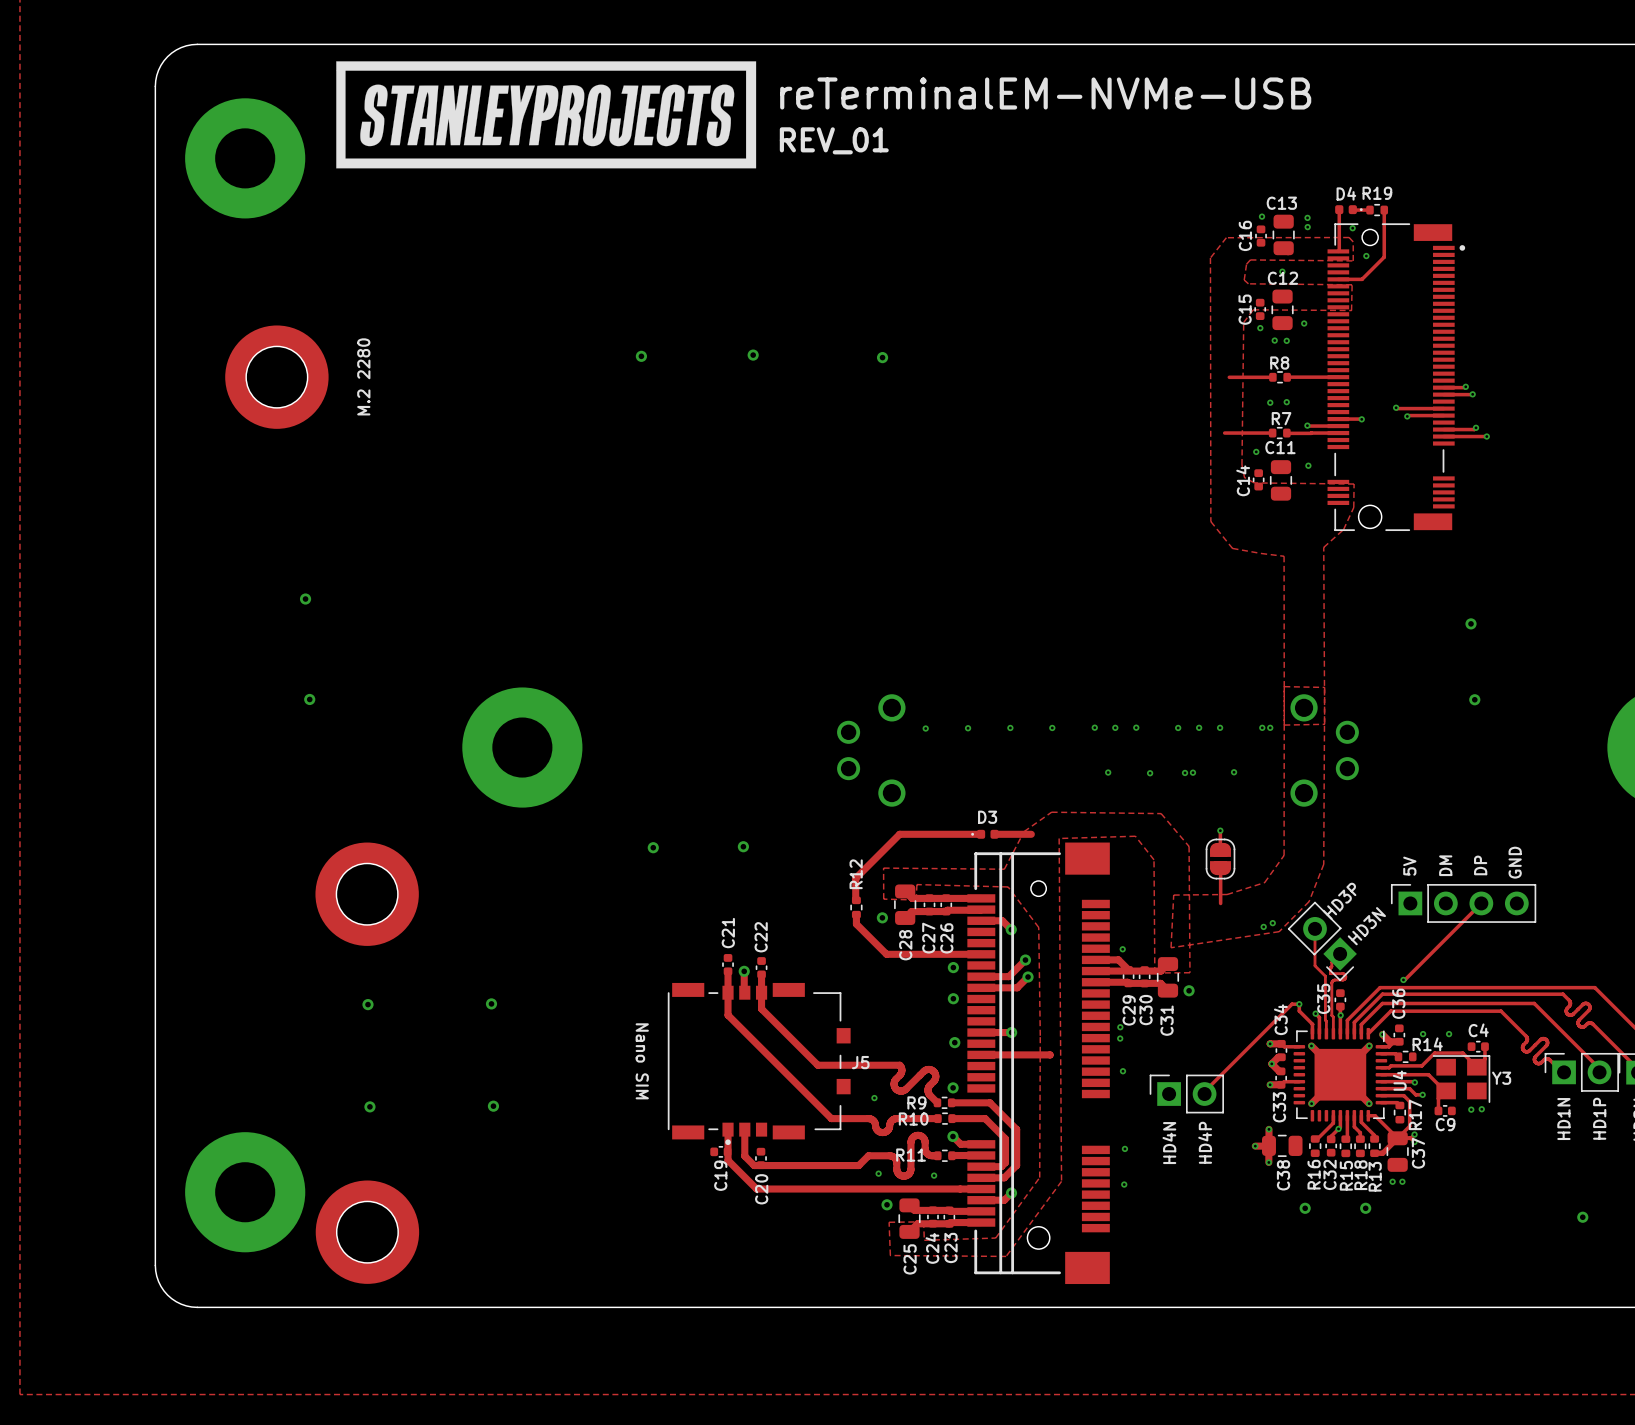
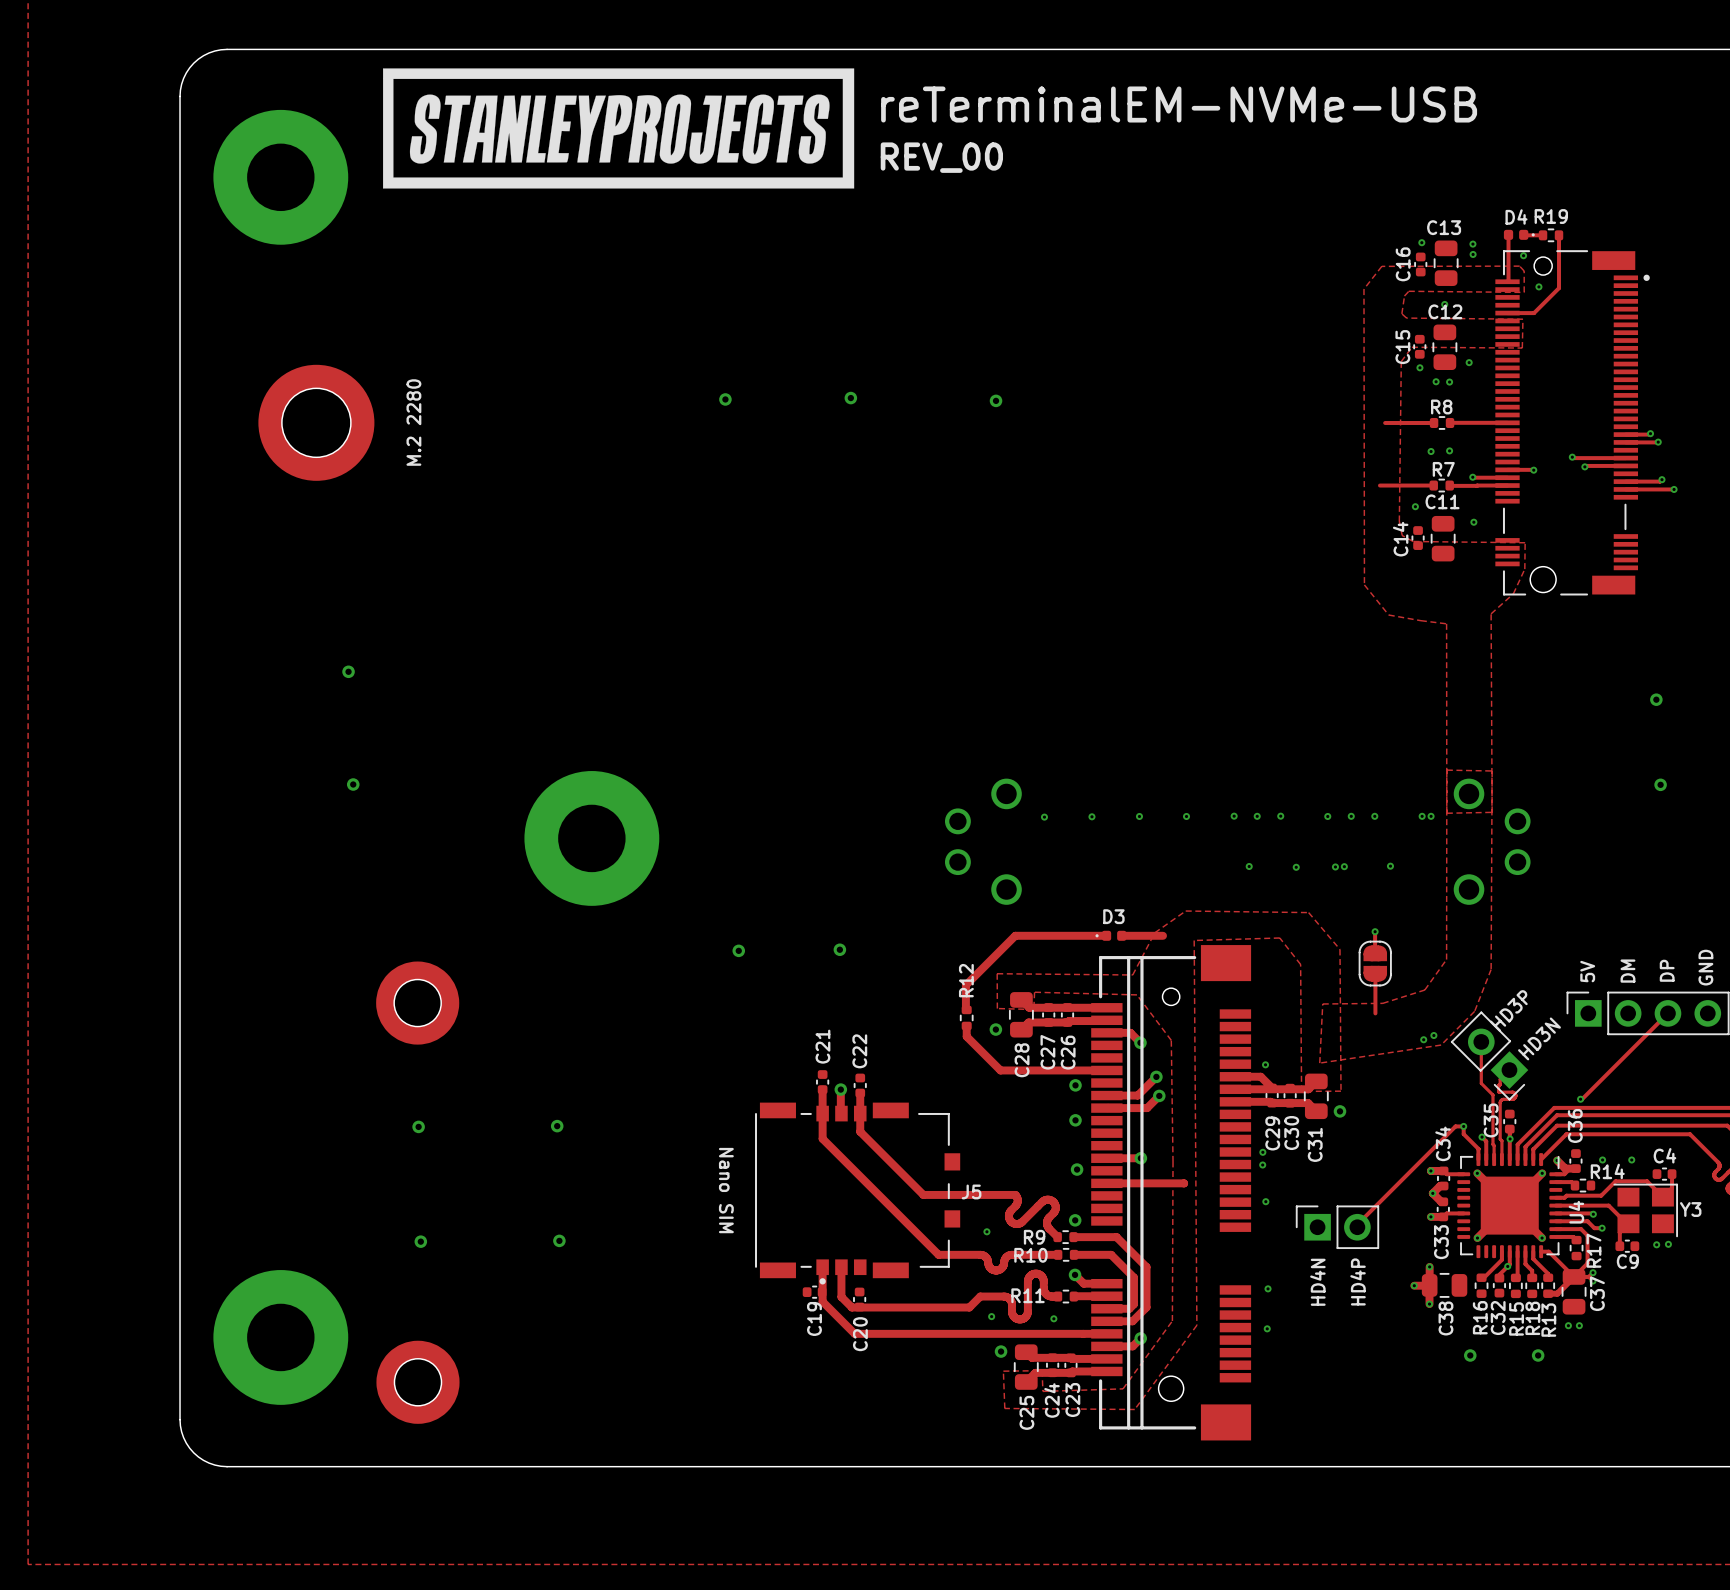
text: REV_01 (834, 140) -> REV_00 (941, 157)
part footprint: [315, 842, 419, 946] -> [376, 961, 460, 1045]
part footprint: [315, 1180, 420, 1284] -> [376, 1340, 460, 1424]

